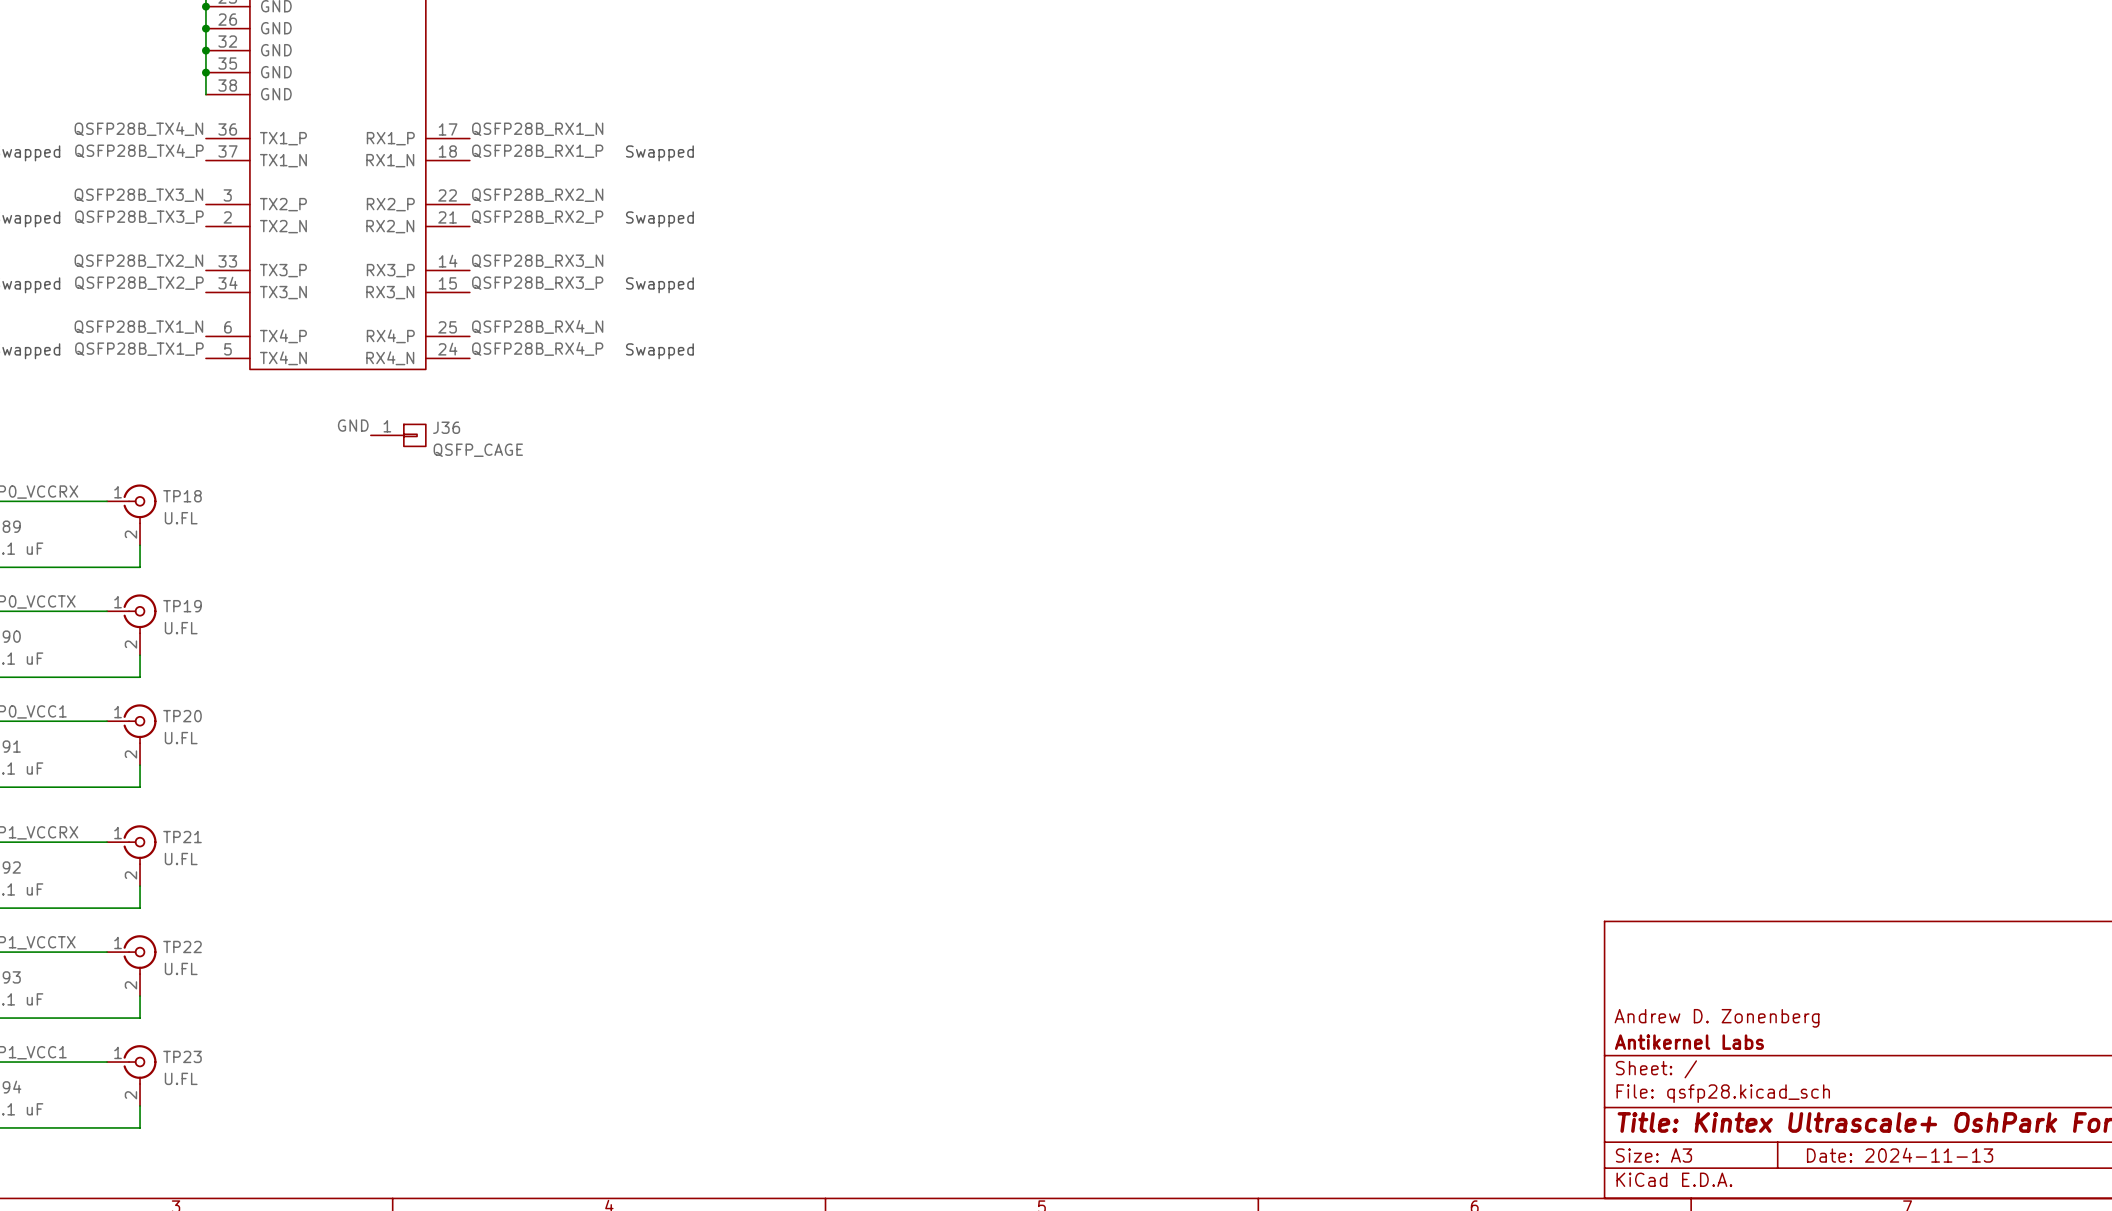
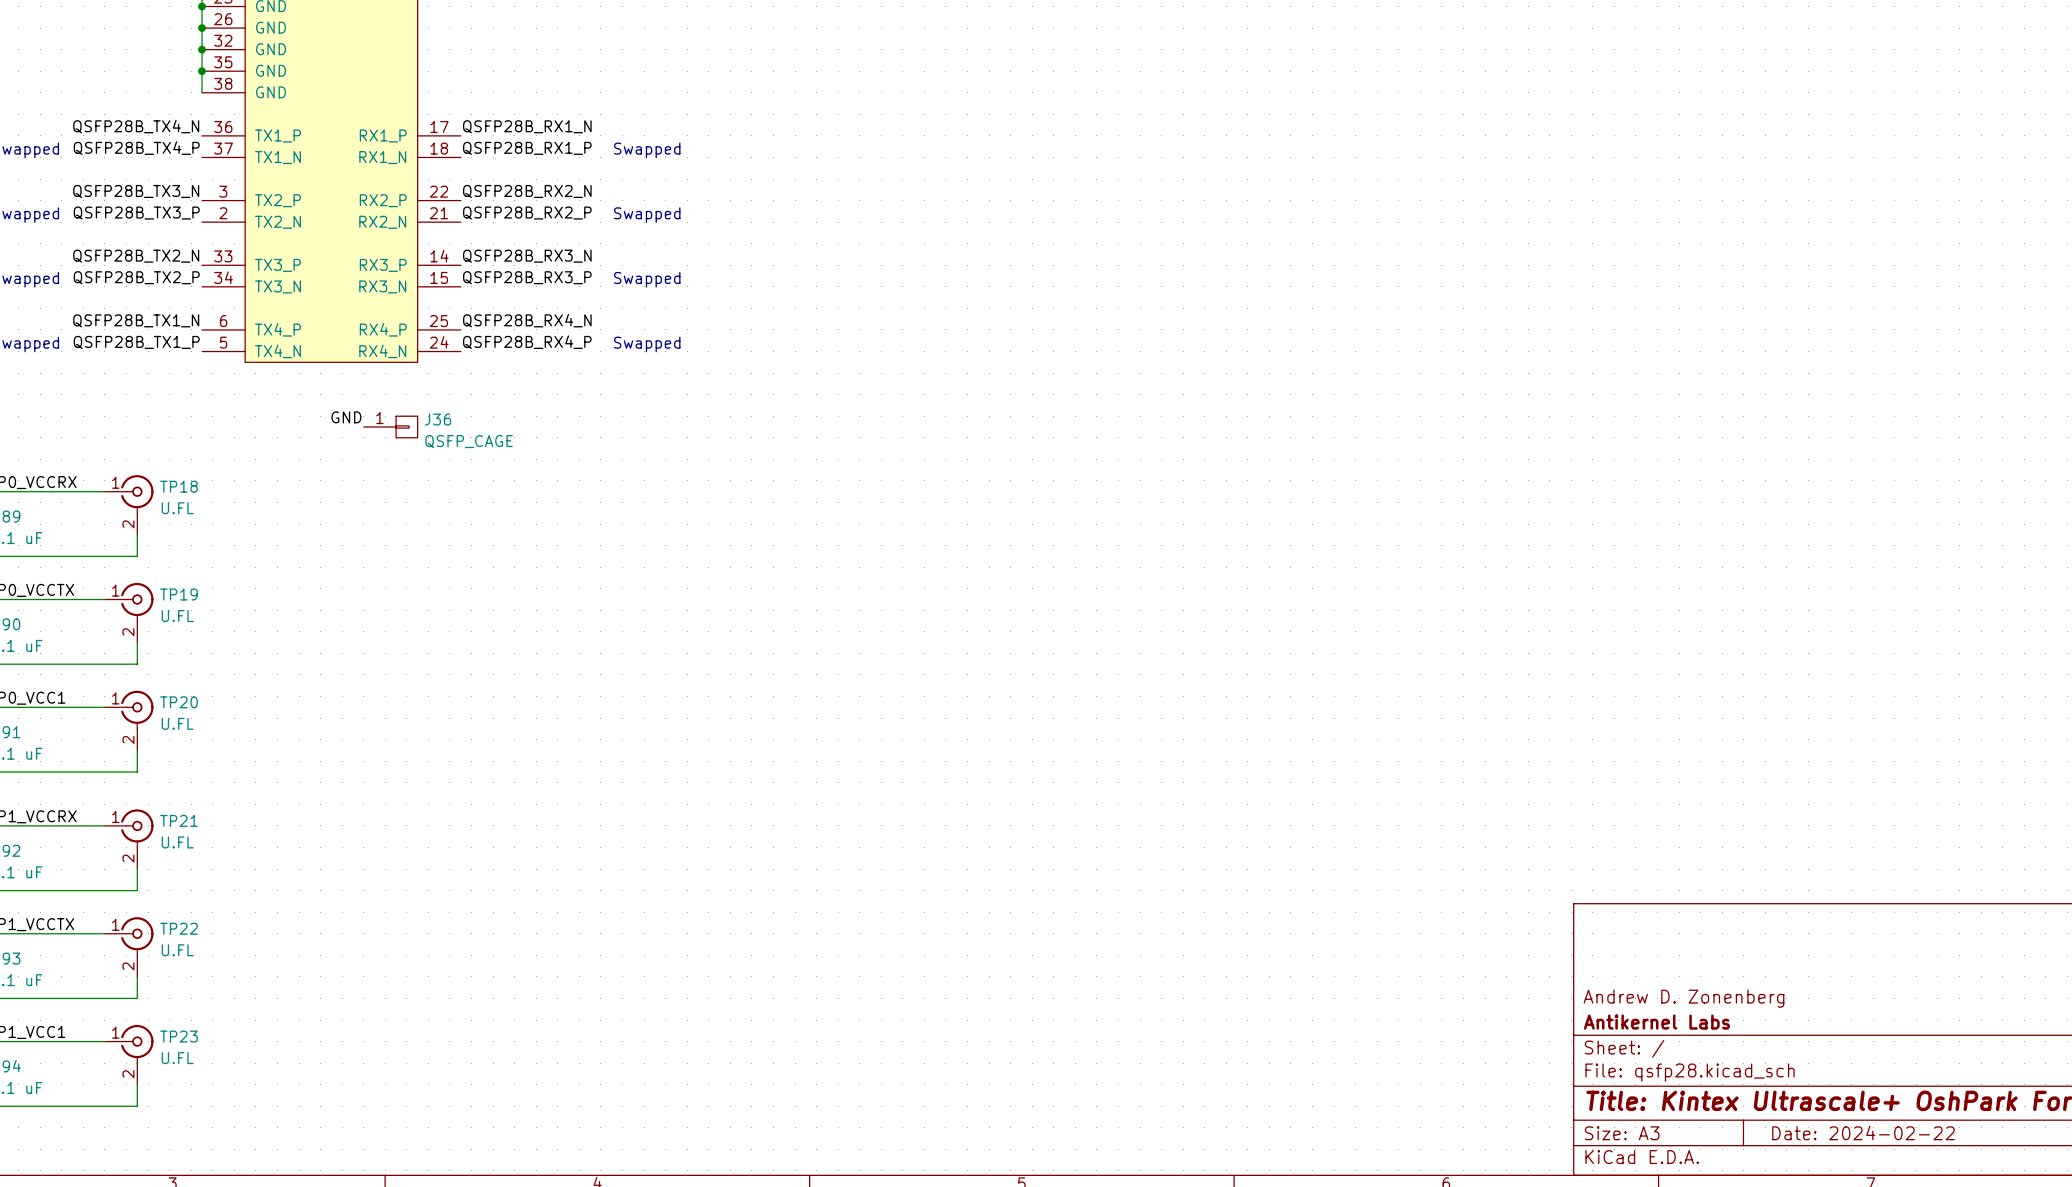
title block: Date: 2024-11-13 (1900, 1155) -> Date: 2024-02-22 (1863, 1132)

